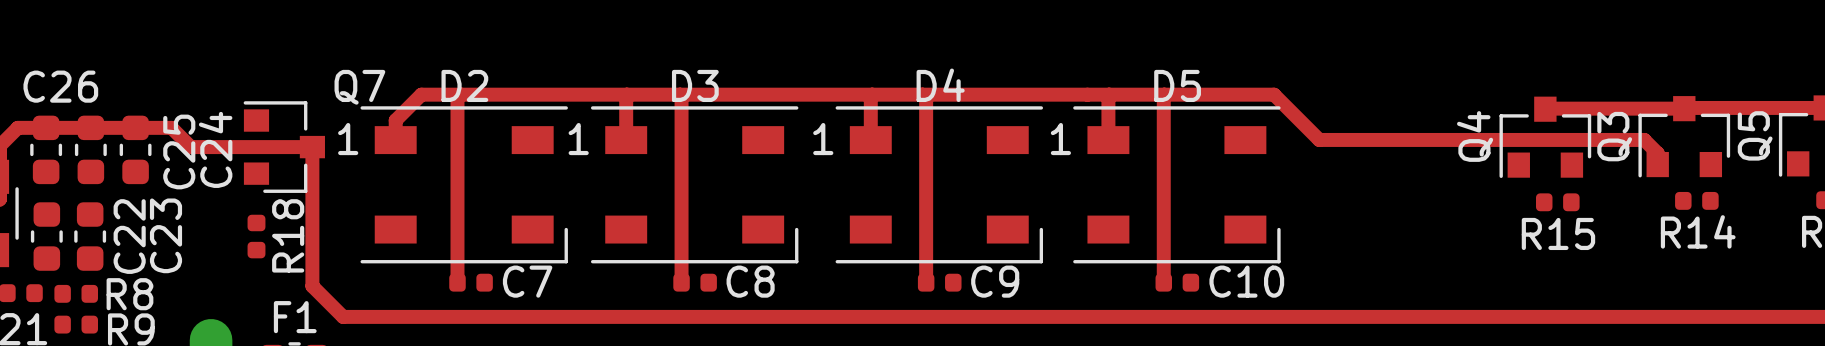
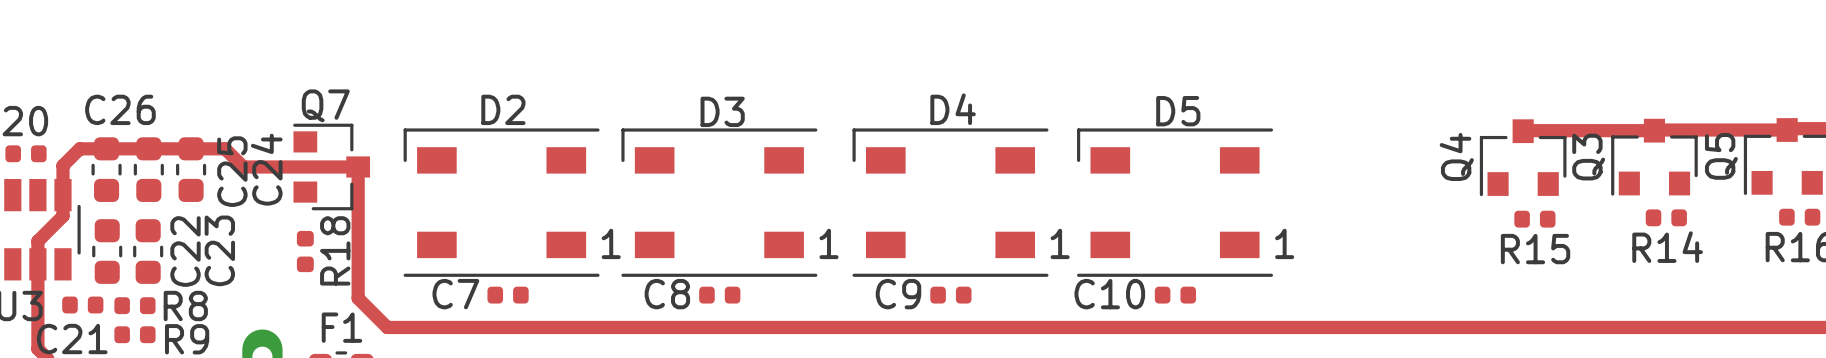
Q7 name position: Q7 (359, 87) -> Q7 (325, 105)
track: (461, 94) (457, 98) (457, 282) -> none
track: (626, 94) (626, 140) -> none
track: (680, 94) (681, 96) (681, 282) -> none
track: (872, 94) (870, 140) -> none
track: (922, 94) (926, 98) (926, 282) -> none
track: (1109, 94) (1108, 140) -> none
track: (1164, 94) (1163, 282) -> none
track: (395, 140) (395, 120) (421, 94) (1274, 94) (1319, 139) (1644, 139) (1657, 153) (1657, 164) -> none
D2 rotation: 0° (464, 184) -> 180° (501, 202)
D3 rotation: 0° (694, 184) -> 180° (719, 202)
D4 rotation: 0° (939, 184) -> 180° (950, 202)
D5 rotation: 0° (1176, 184) -> 180° (1175, 202)
C7 name position: C7 (527, 281) -> C7 (455, 294)
C8 name position: C8 (750, 281) -> C8 (667, 294)
C9 name position: C9 (995, 281) -> C9 (898, 294)
C10 name position: C10 (1246, 281) -> C10 (1109, 294)

